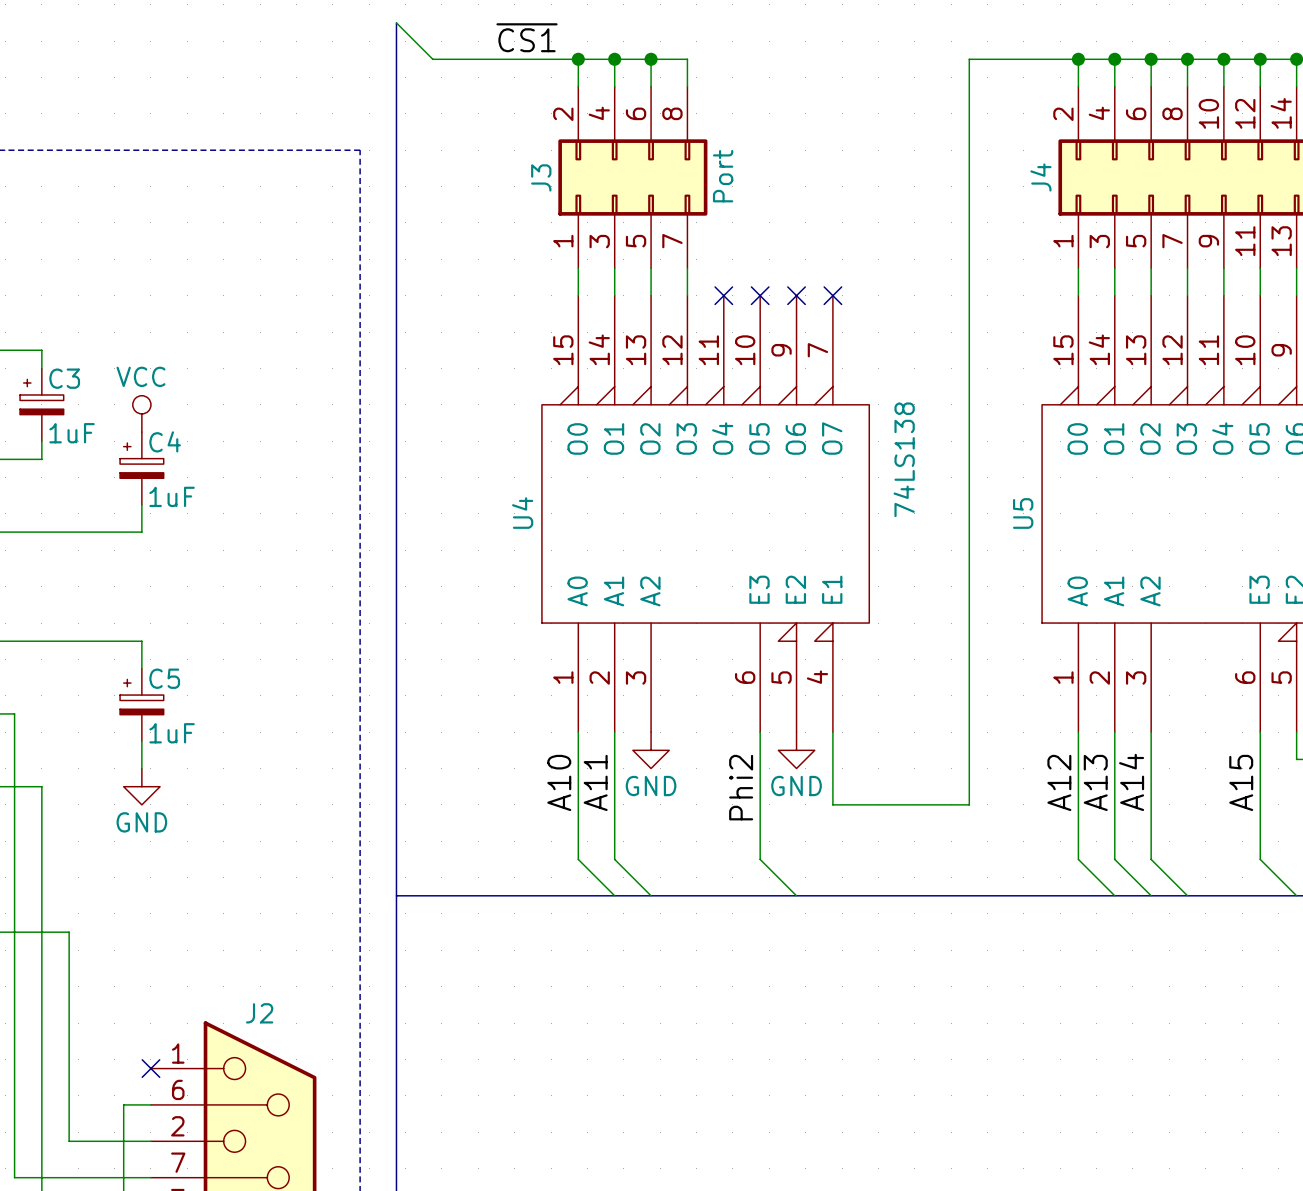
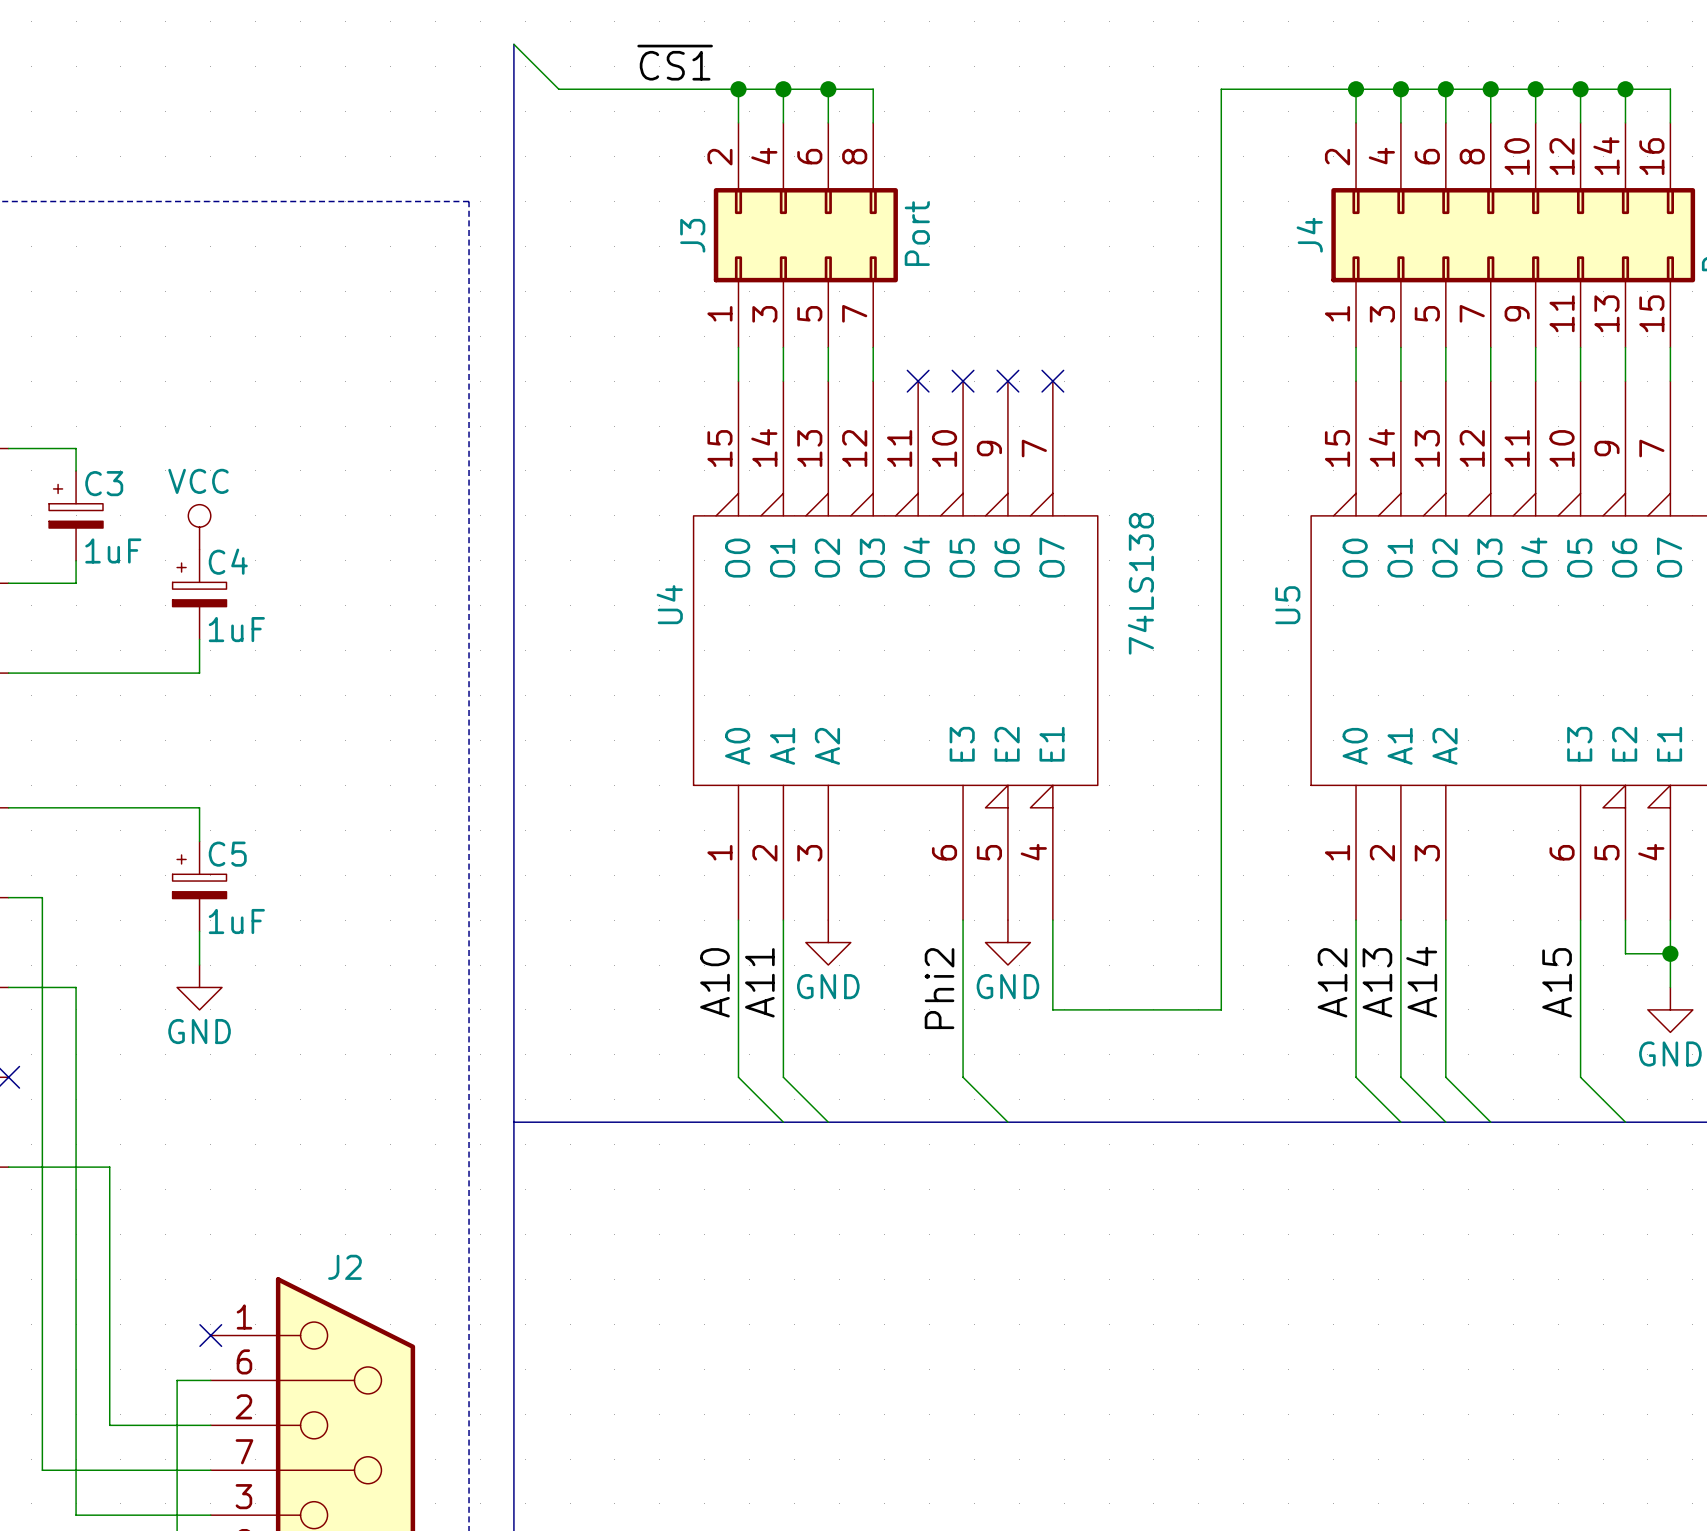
U4 name position: U4 (522, 513) -> U4 (669, 604)
U5 name position: U5 (1023, 513) -> U5 (1287, 605)

